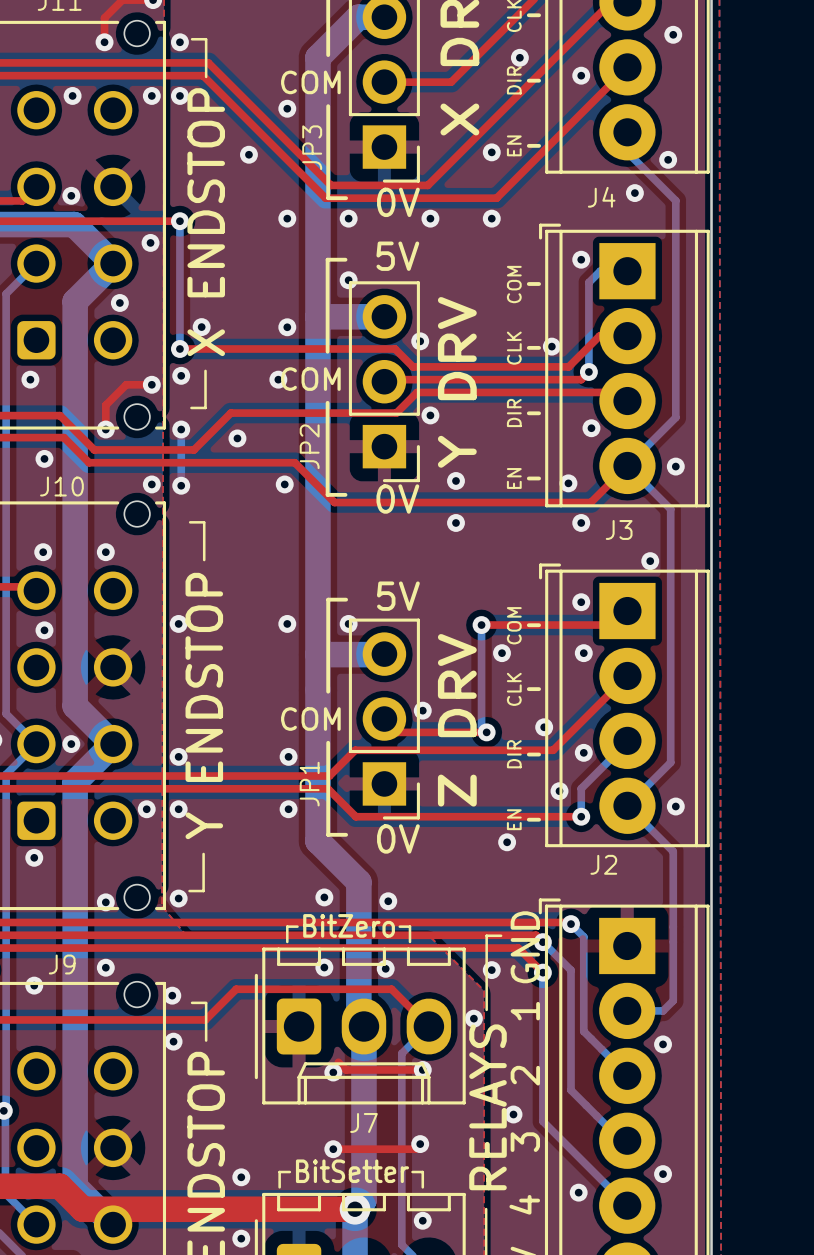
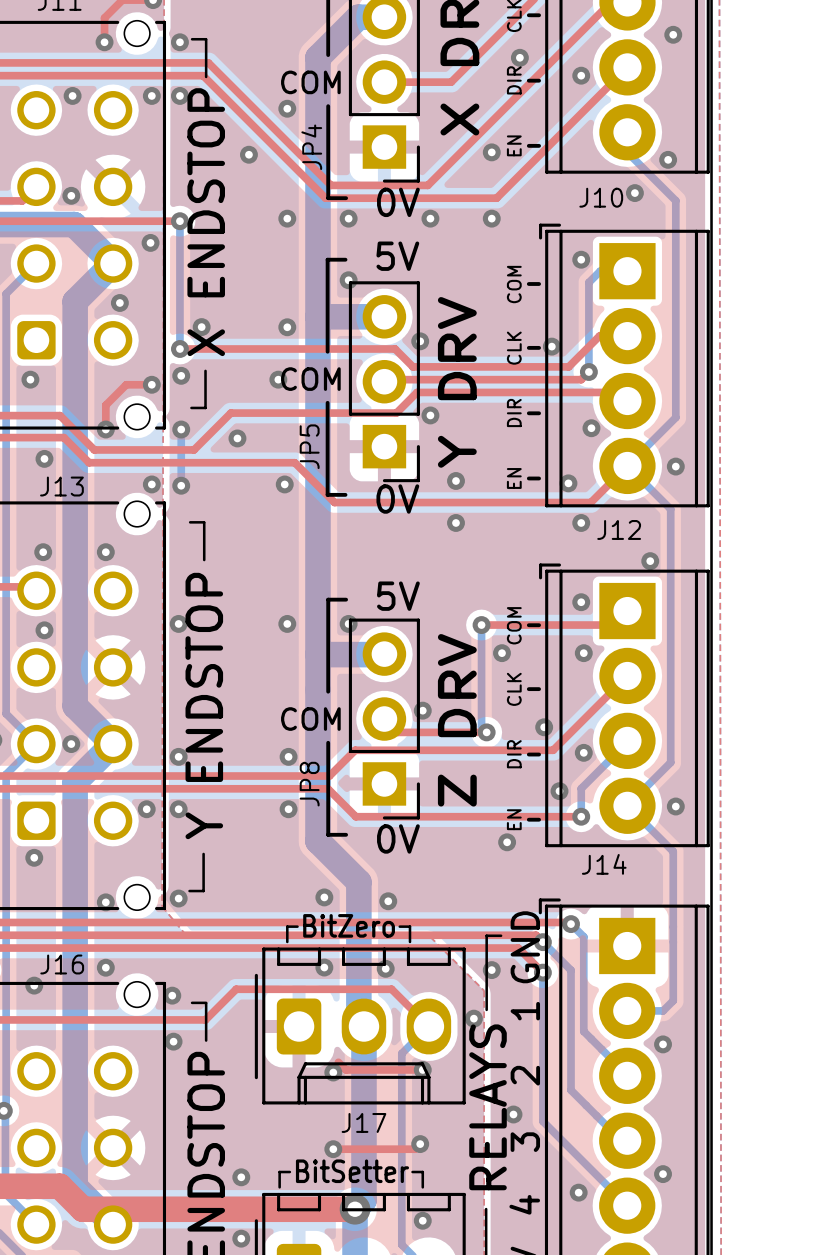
JP3 name: JP3 (312, 147) -> JP4 (311, 147)
J4 name: J4 (601, 197) -> J10 (601, 197)
JP2 name: JP2 (309, 446) -> JP5 (309, 446)
J10 name: J10 (61, 486) -> J13 (61, 486)
J3 name: J3 (619, 529) -> J12 (619, 529)
JP1 name: JP1 (309, 784) -> JP8 (309, 784)
J2 name: J2 (603, 864) -> J14 (604, 864)
J9 name: J9 (62, 964) -> J16 (62, 964)
J7 name: J7 (363, 1122) -> J17 (363, 1122)

